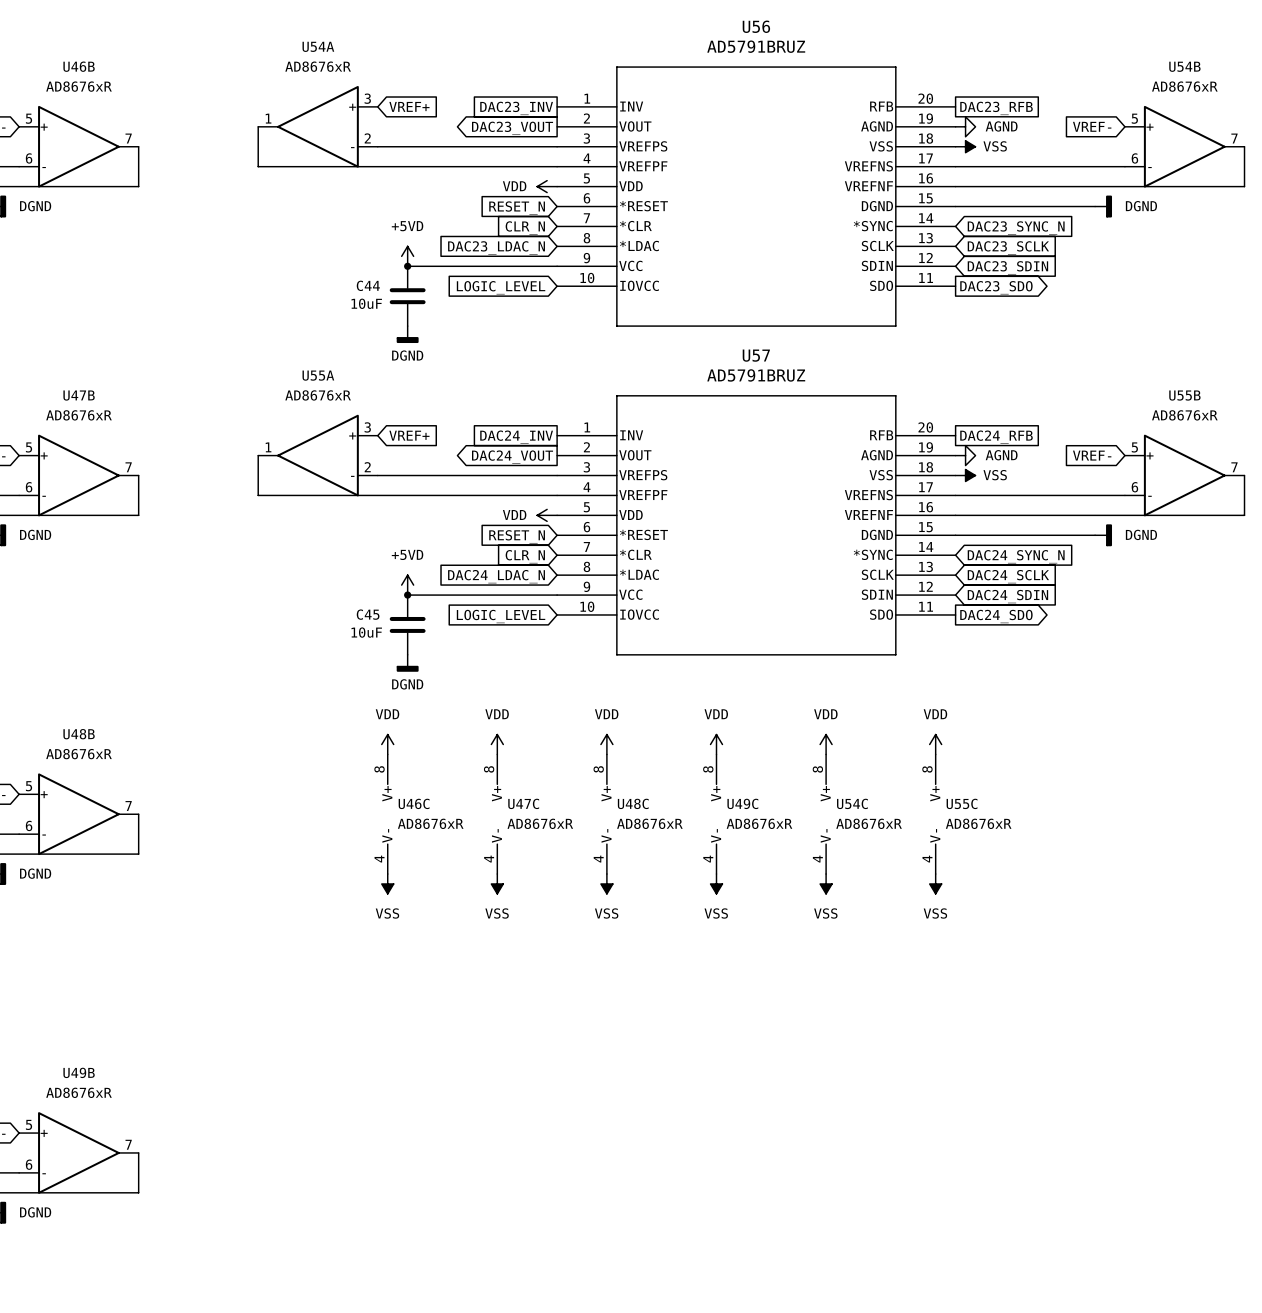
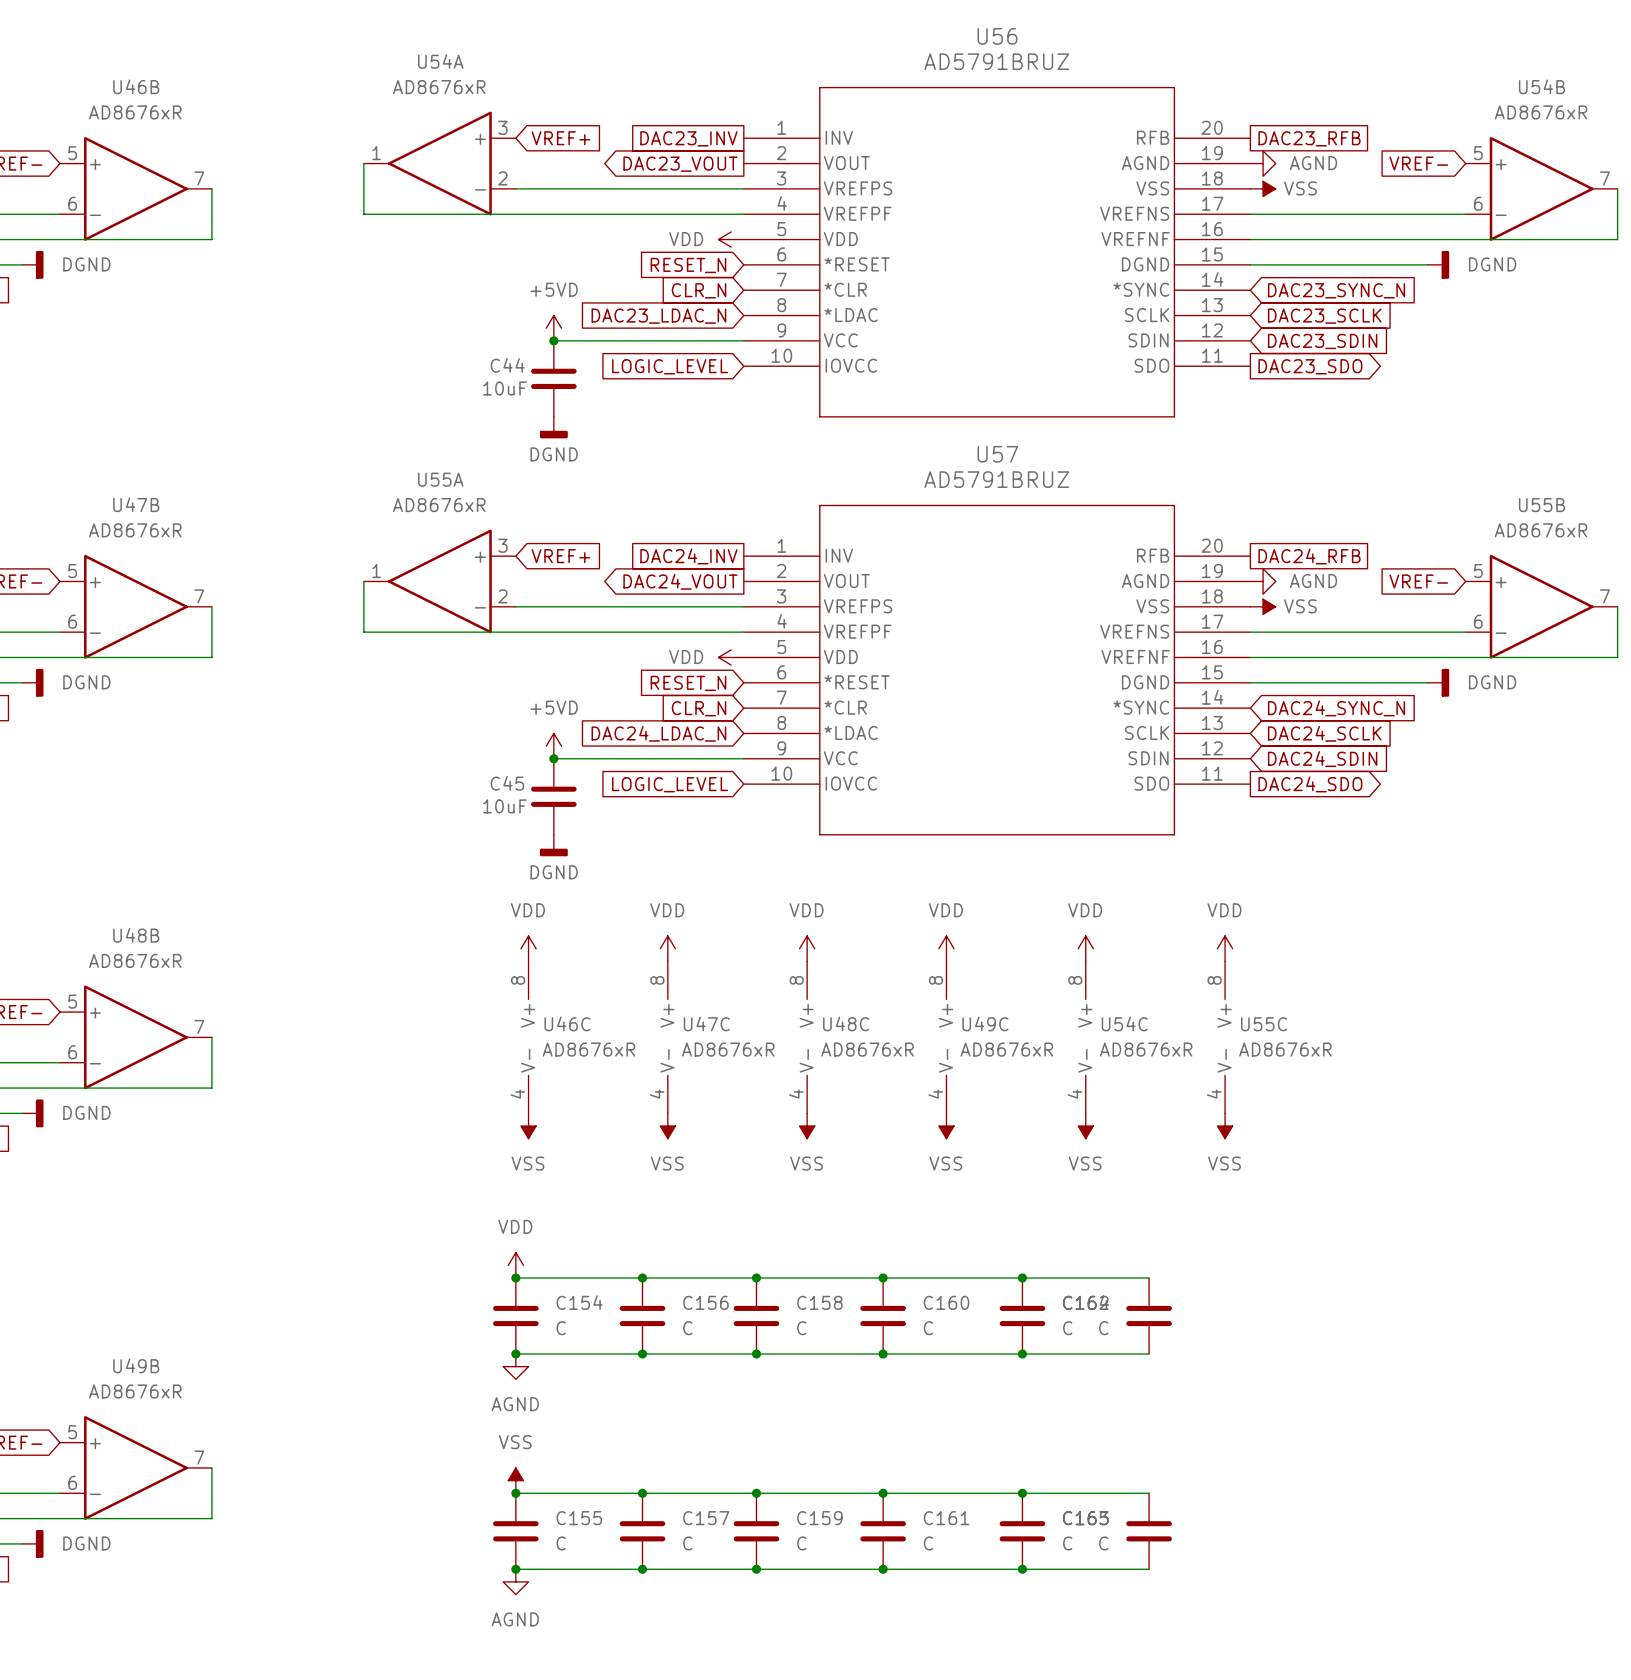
power symbol: none -> VDD (515, 1265)
wire: none -> (515, 1278) (1149, 1278)
junction: none -> (515, 1278)
junction: none -> (642, 1278)
junction: none -> (756, 1278)
junction: none -> (883, 1278)
junction: none -> (1022, 1278)
C154: none -> C (515, 1316)
C156: none -> C (642, 1316)
C158: none -> C (756, 1316)
C160: none -> C (883, 1316)
part: none -> C (1022, 1316)
part: none -> C (1149, 1316)
wire: none -> (515, 1353) (1149, 1353)
junction: none -> (515, 1353)
junction: none -> (642, 1353)
junction: none -> (756, 1353)
junction: none -> (883, 1353)
junction: none -> (1022, 1353)
power symbol: none -> AGND (515, 1366)
power symbol: none -> VSS (515, 1480)
wire: none -> (515, 1493) (1149, 1493)
junction: none -> (515, 1493)
junction: none -> (642, 1493)
junction: none -> (756, 1493)
junction: none -> (883, 1493)
junction: none -> (1022, 1493)
C155: none -> C (515, 1531)
C157: none -> C (642, 1531)
C159: none -> C (756, 1531)
C161: none -> C (883, 1531)
part: none -> C (1022, 1531)
part: none -> C (1149, 1531)
wire: none -> (515, 1569) (1149, 1569)
junction: none -> (515, 1569)
junction: none -> (642, 1569)
junction: none -> (756, 1569)
junction: none -> (883, 1569)
junction: none -> (1022, 1569)
power symbol: none -> AGND (515, 1581)

